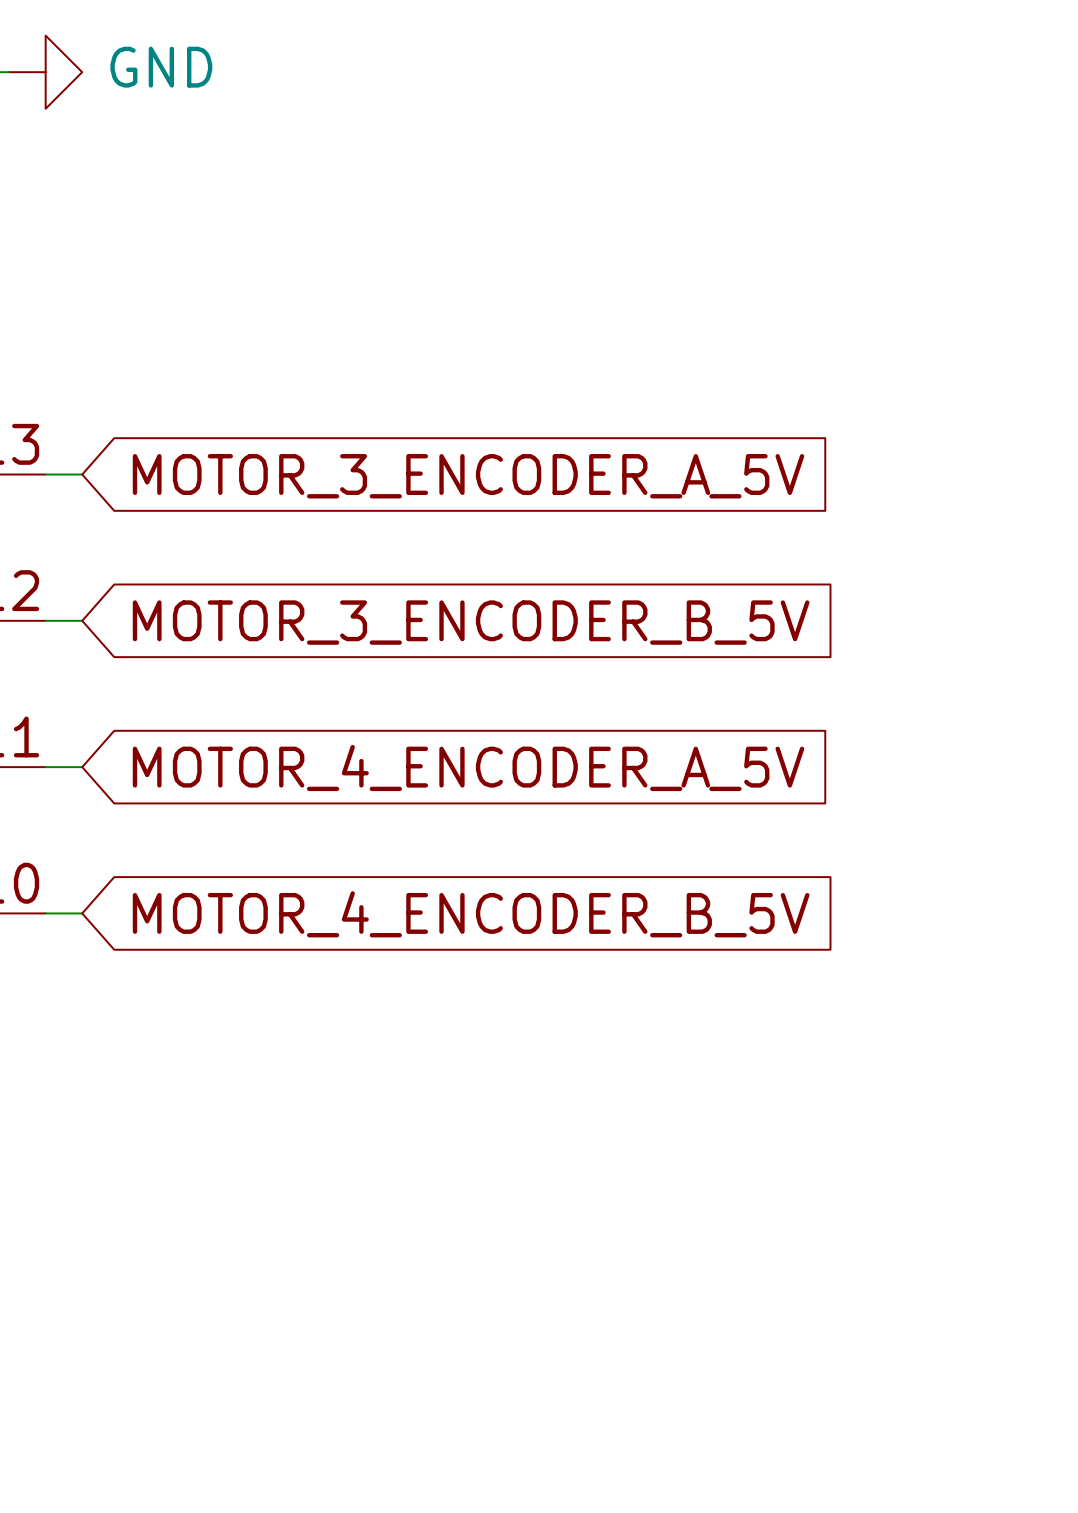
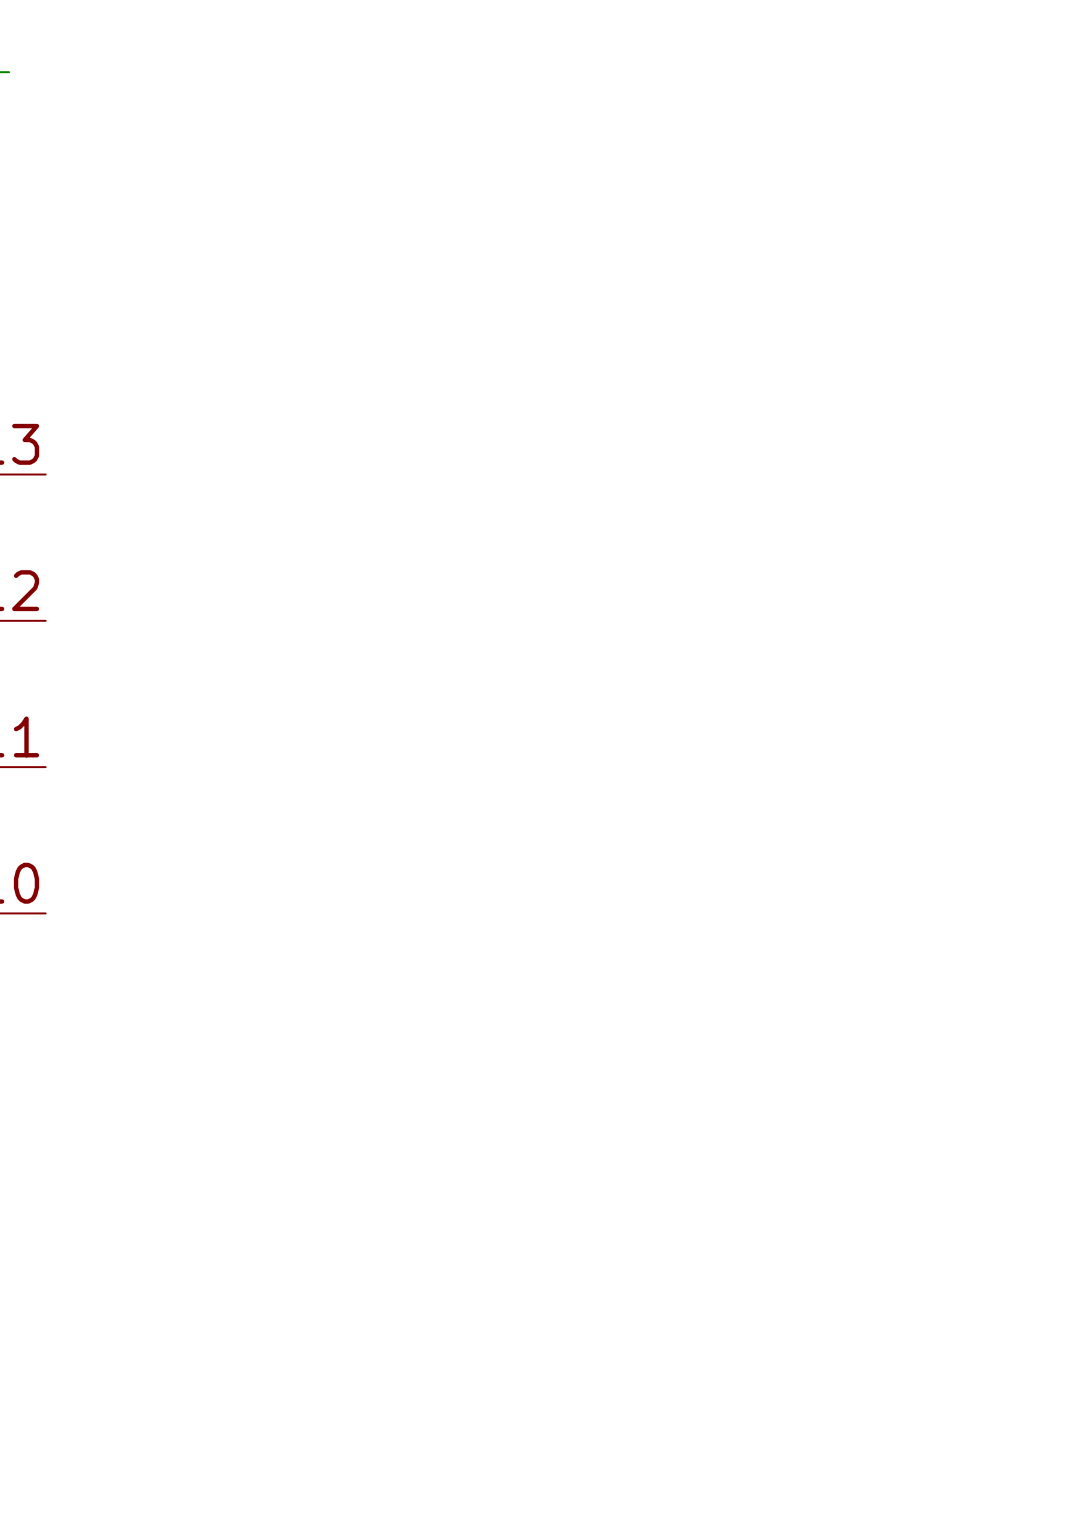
power symbol: GND (45, 72) -> none
wire: (45, 474) (82, 474) -> none
global label: MOTOR_3_ENCODER_A_5V (468, 476) -> none
wire: (45, 620) (82, 620) -> none
global label: MOTOR_3_ENCODER_B_5V (471, 622) -> none
wire: (45, 767) (82, 767) -> none
global label: MOTOR_4_ENCODER_A_5V (468, 767) -> none
wire: (45, 913) (82, 913) -> none
global label: MOTOR_4_ENCODER_B_5V (471, 914) -> none

